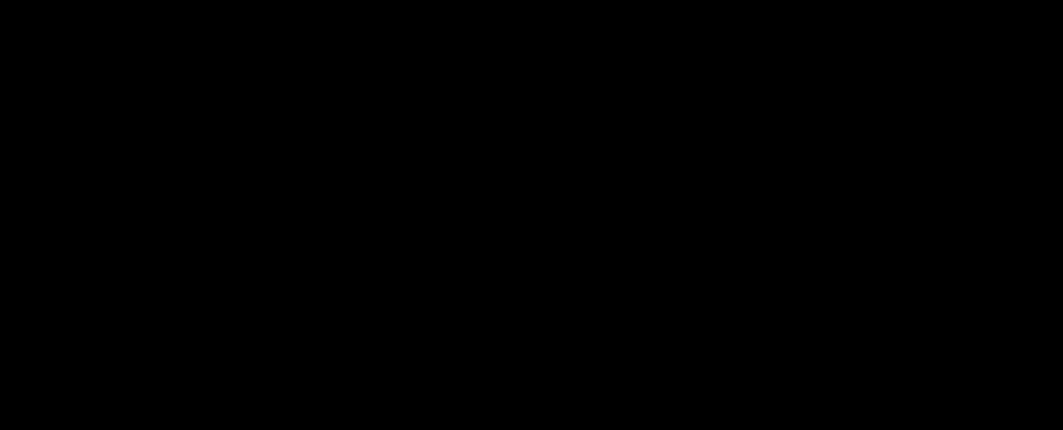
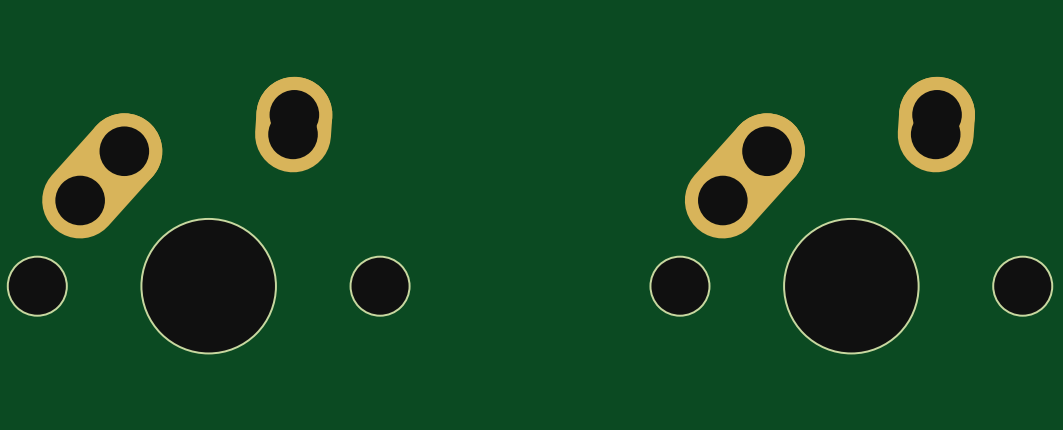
part: none -> (208, 215)
part: none -> (851, 215)

